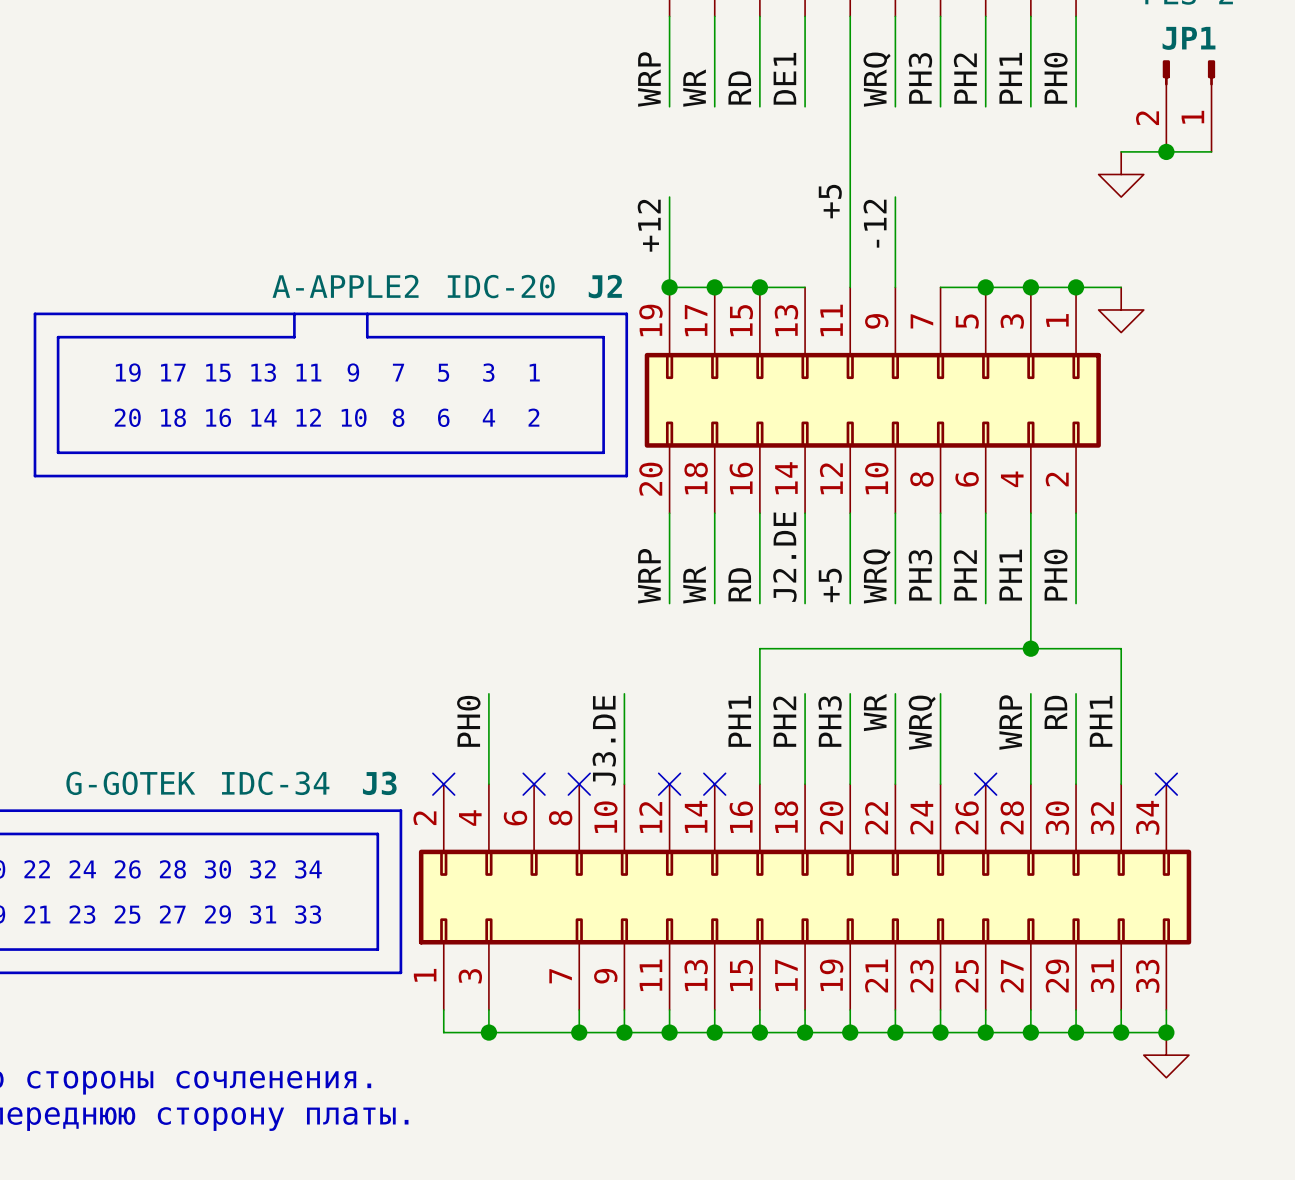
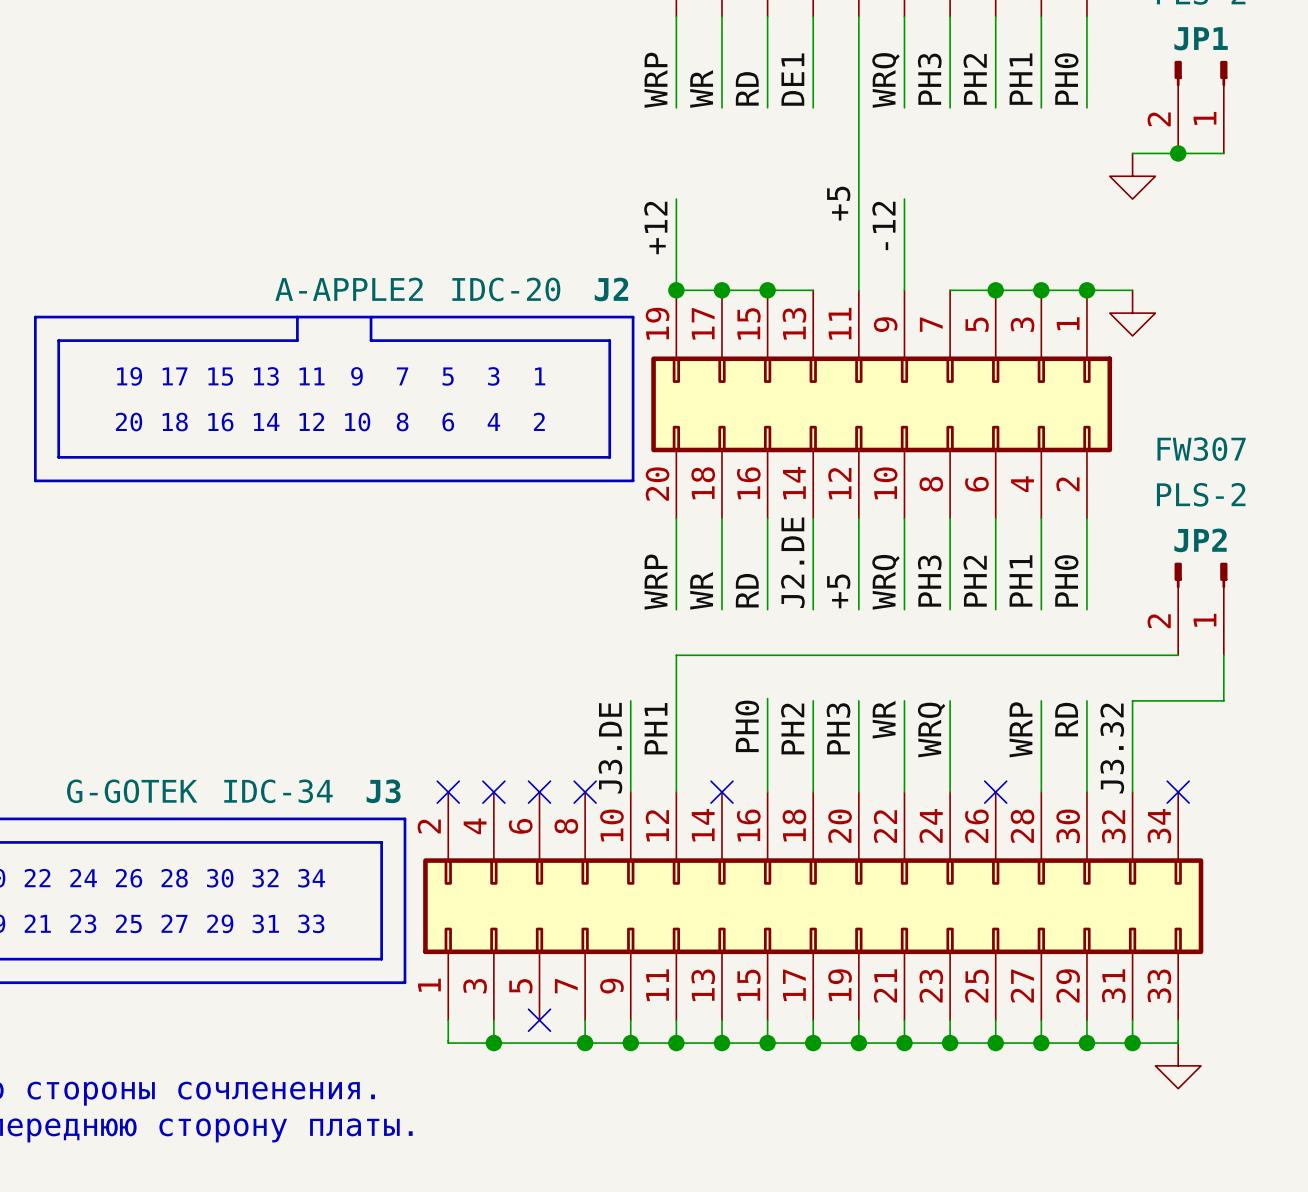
JP2: none -> PLS‐2 (1201, 608)
wire: (1030, 603) (1030, 648) -> none
wire: (759, 648) (759, 691) -> (767, 655) (676, 655) (676, 792)
junction: (1030, 648) -> none
wire: (1121, 648) (1121, 693) -> (1132, 655) (1178, 655)
wire: none -> (1223, 655) (1223, 700) (1132, 700)
wire: (488, 693) (488, 784) -> none
label position: PH0 (468, 721) -> PH0 (747, 726)
label position: PH1 (739, 721) -> PH1 (656, 728)
label: PH1 (1101, 721) -> J3.32 (1112, 748)
J3 symbol: [418, 784, 1192, 1010] -> [423, 792, 1204, 1021]
no-connect mark: none -> (493, 792)
no-connect mark: (669, 784) -> none
no-connect mark: none -> (539, 1020)
junction: (1166, 1032) -> none

